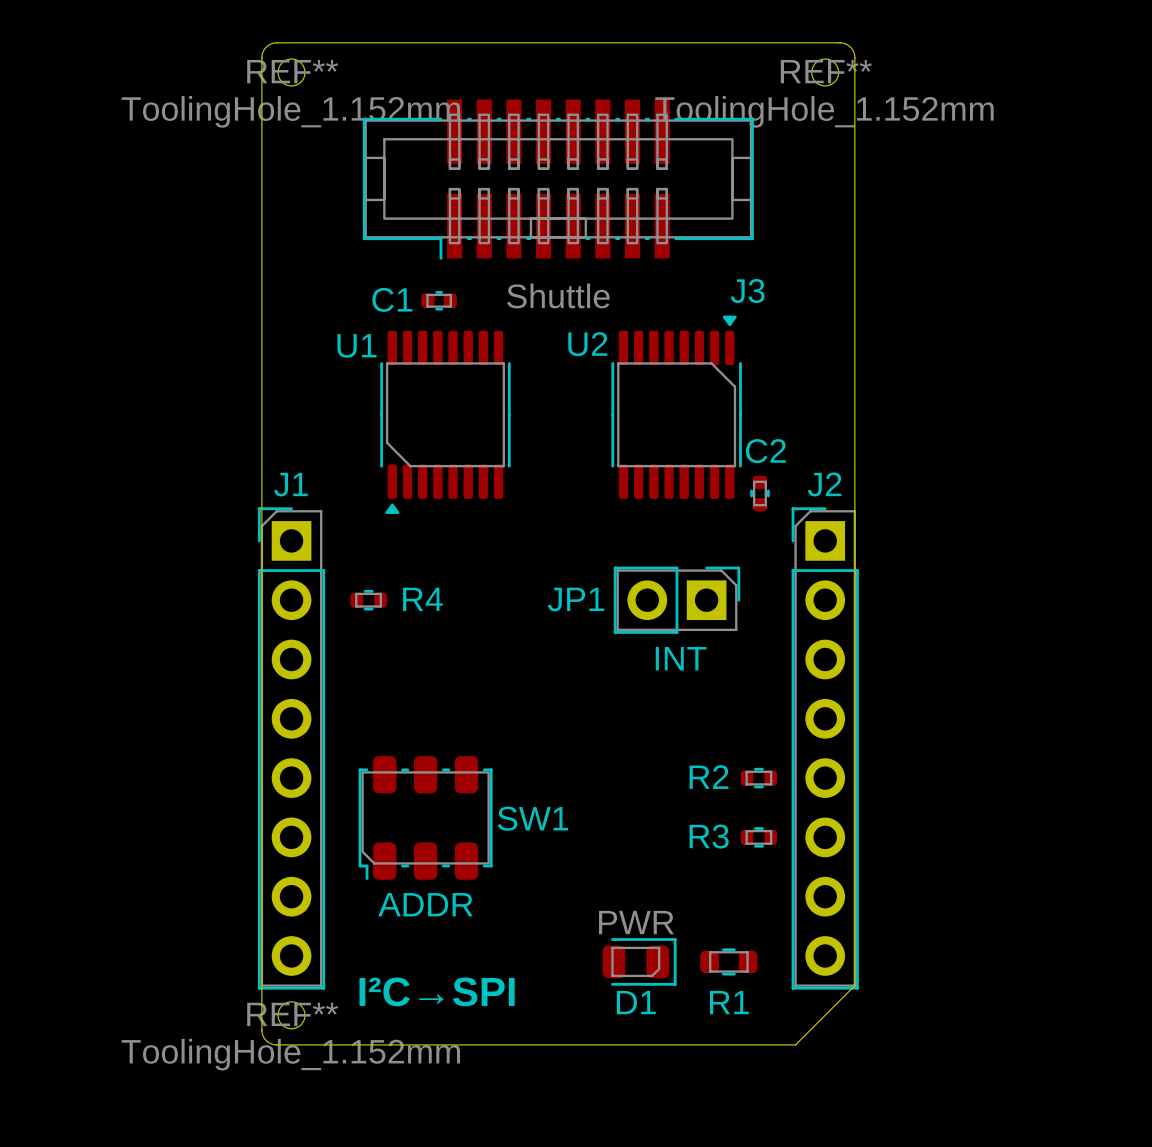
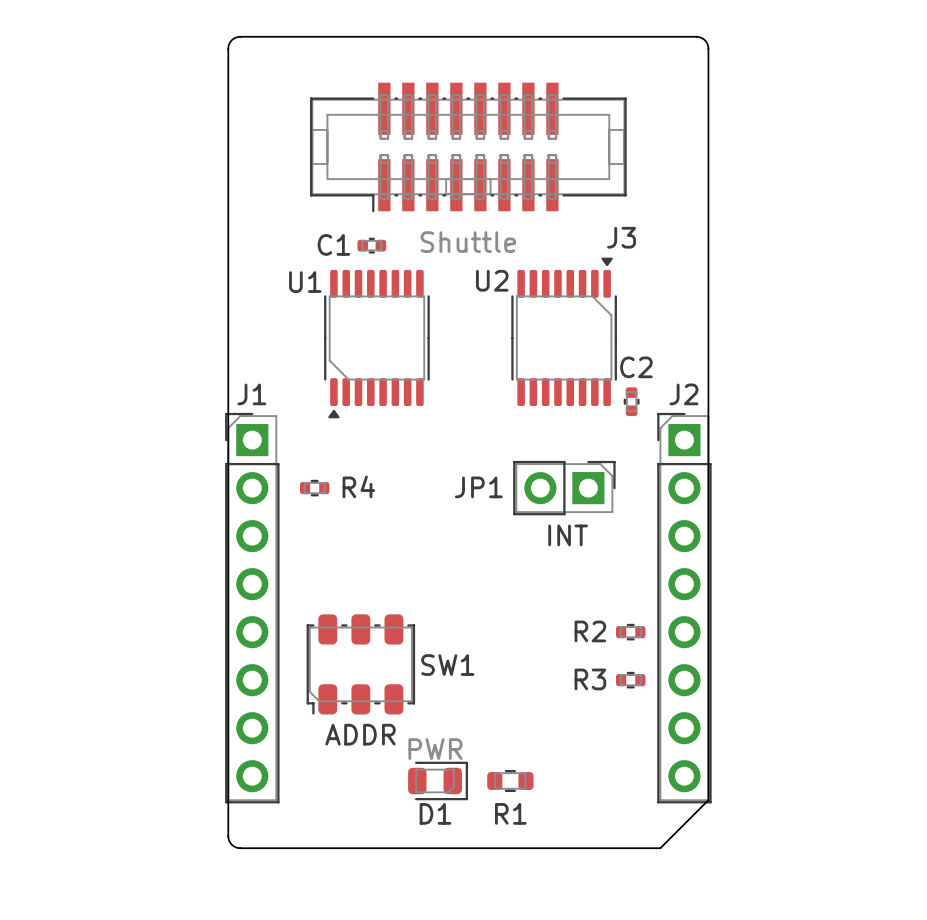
REF**: ToolingHole_1.152mm (291, 72) -> none
REF**: ToolingHole_1.152mm (825, 72) -> none
D1 position: (639, 961) -> (438, 780)
R1 position: (728, 961) -> (510, 780)
text: I²C→SPI (437, 991) -> none
REF**: ToolingHole_1.152mm (291, 1015) -> none

